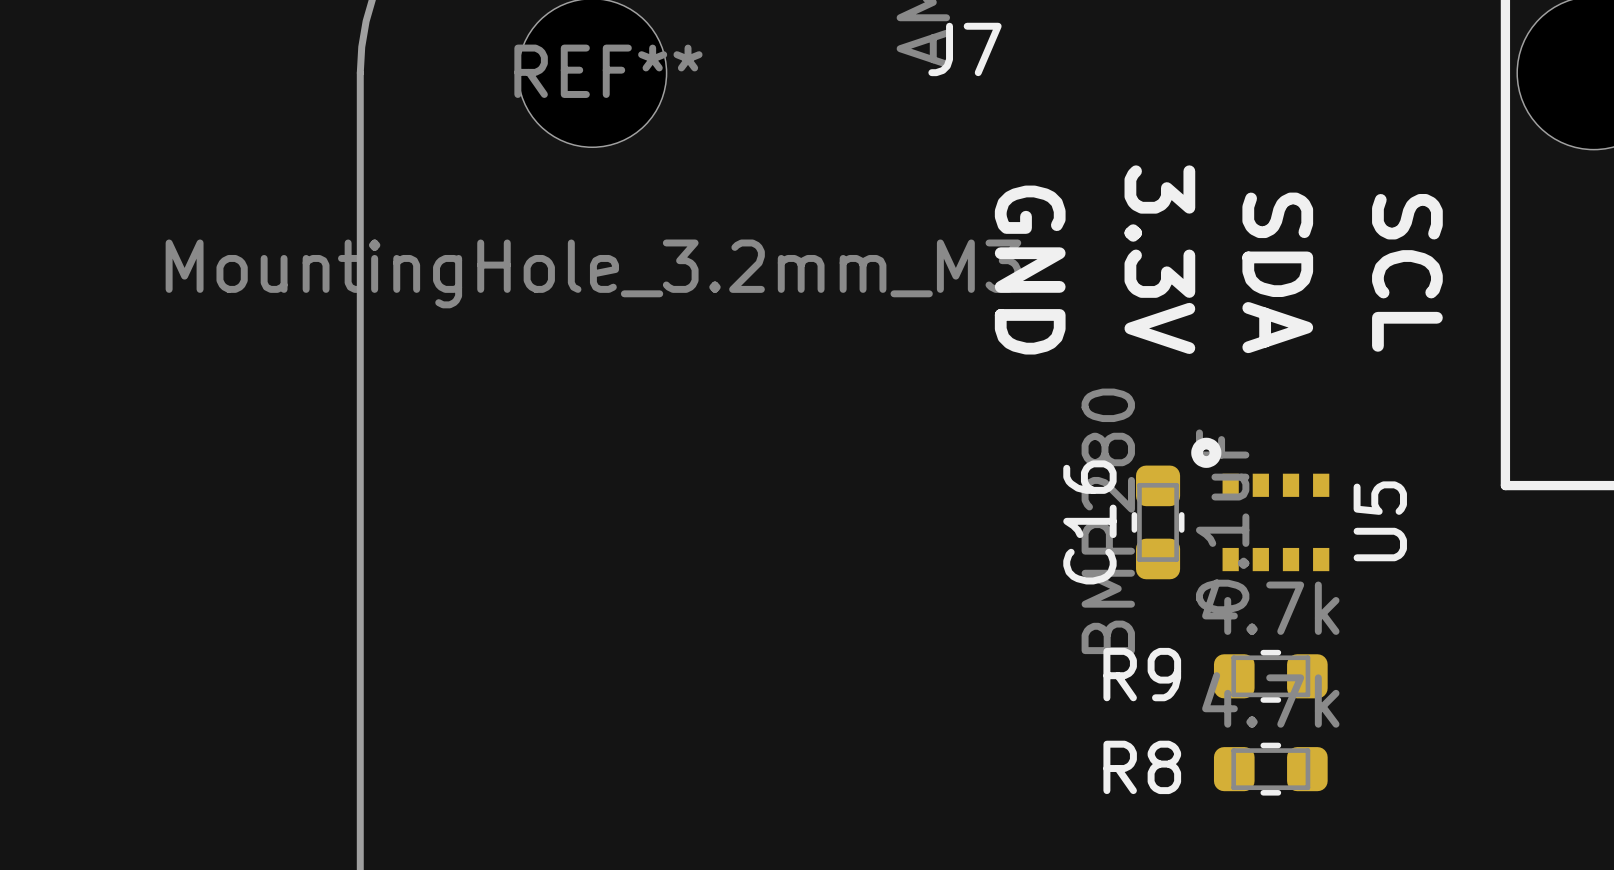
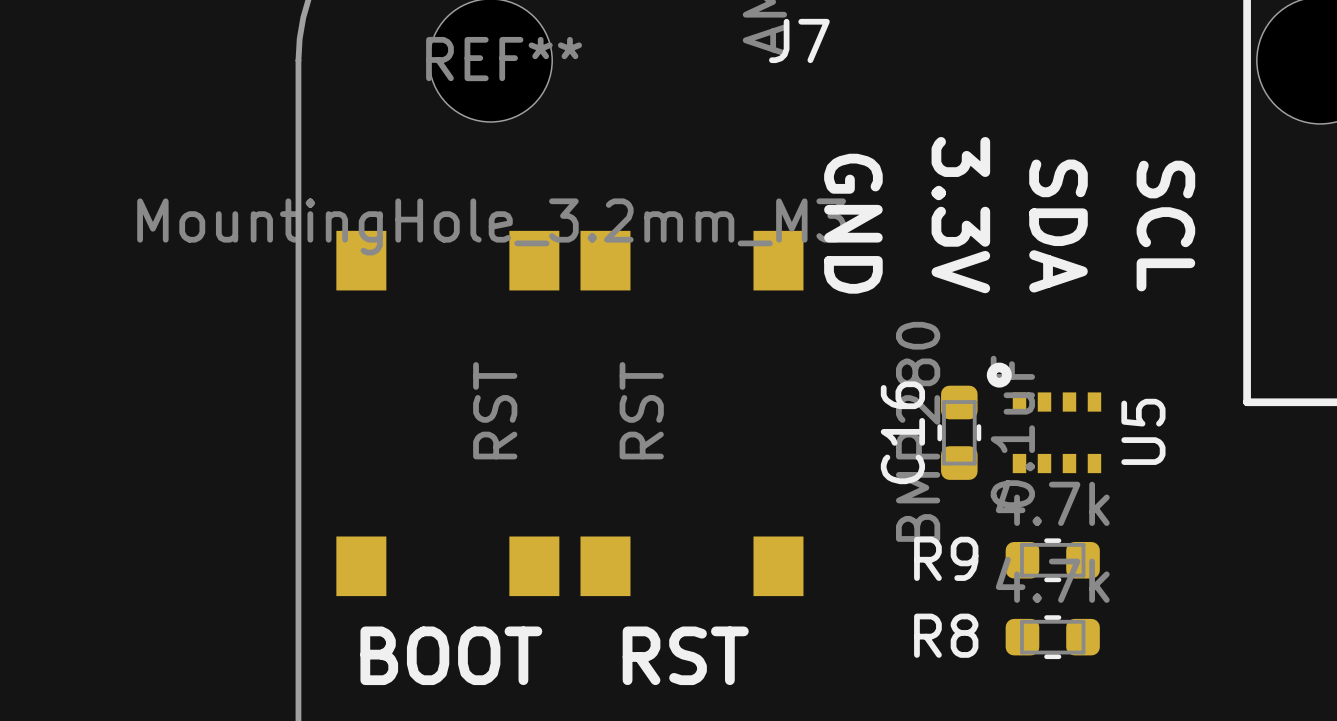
part: none -> RST (447, 413)
part: none -> RST (691, 413)
text: none -> BOOT (451, 655)
text: none -> RST (685, 655)

